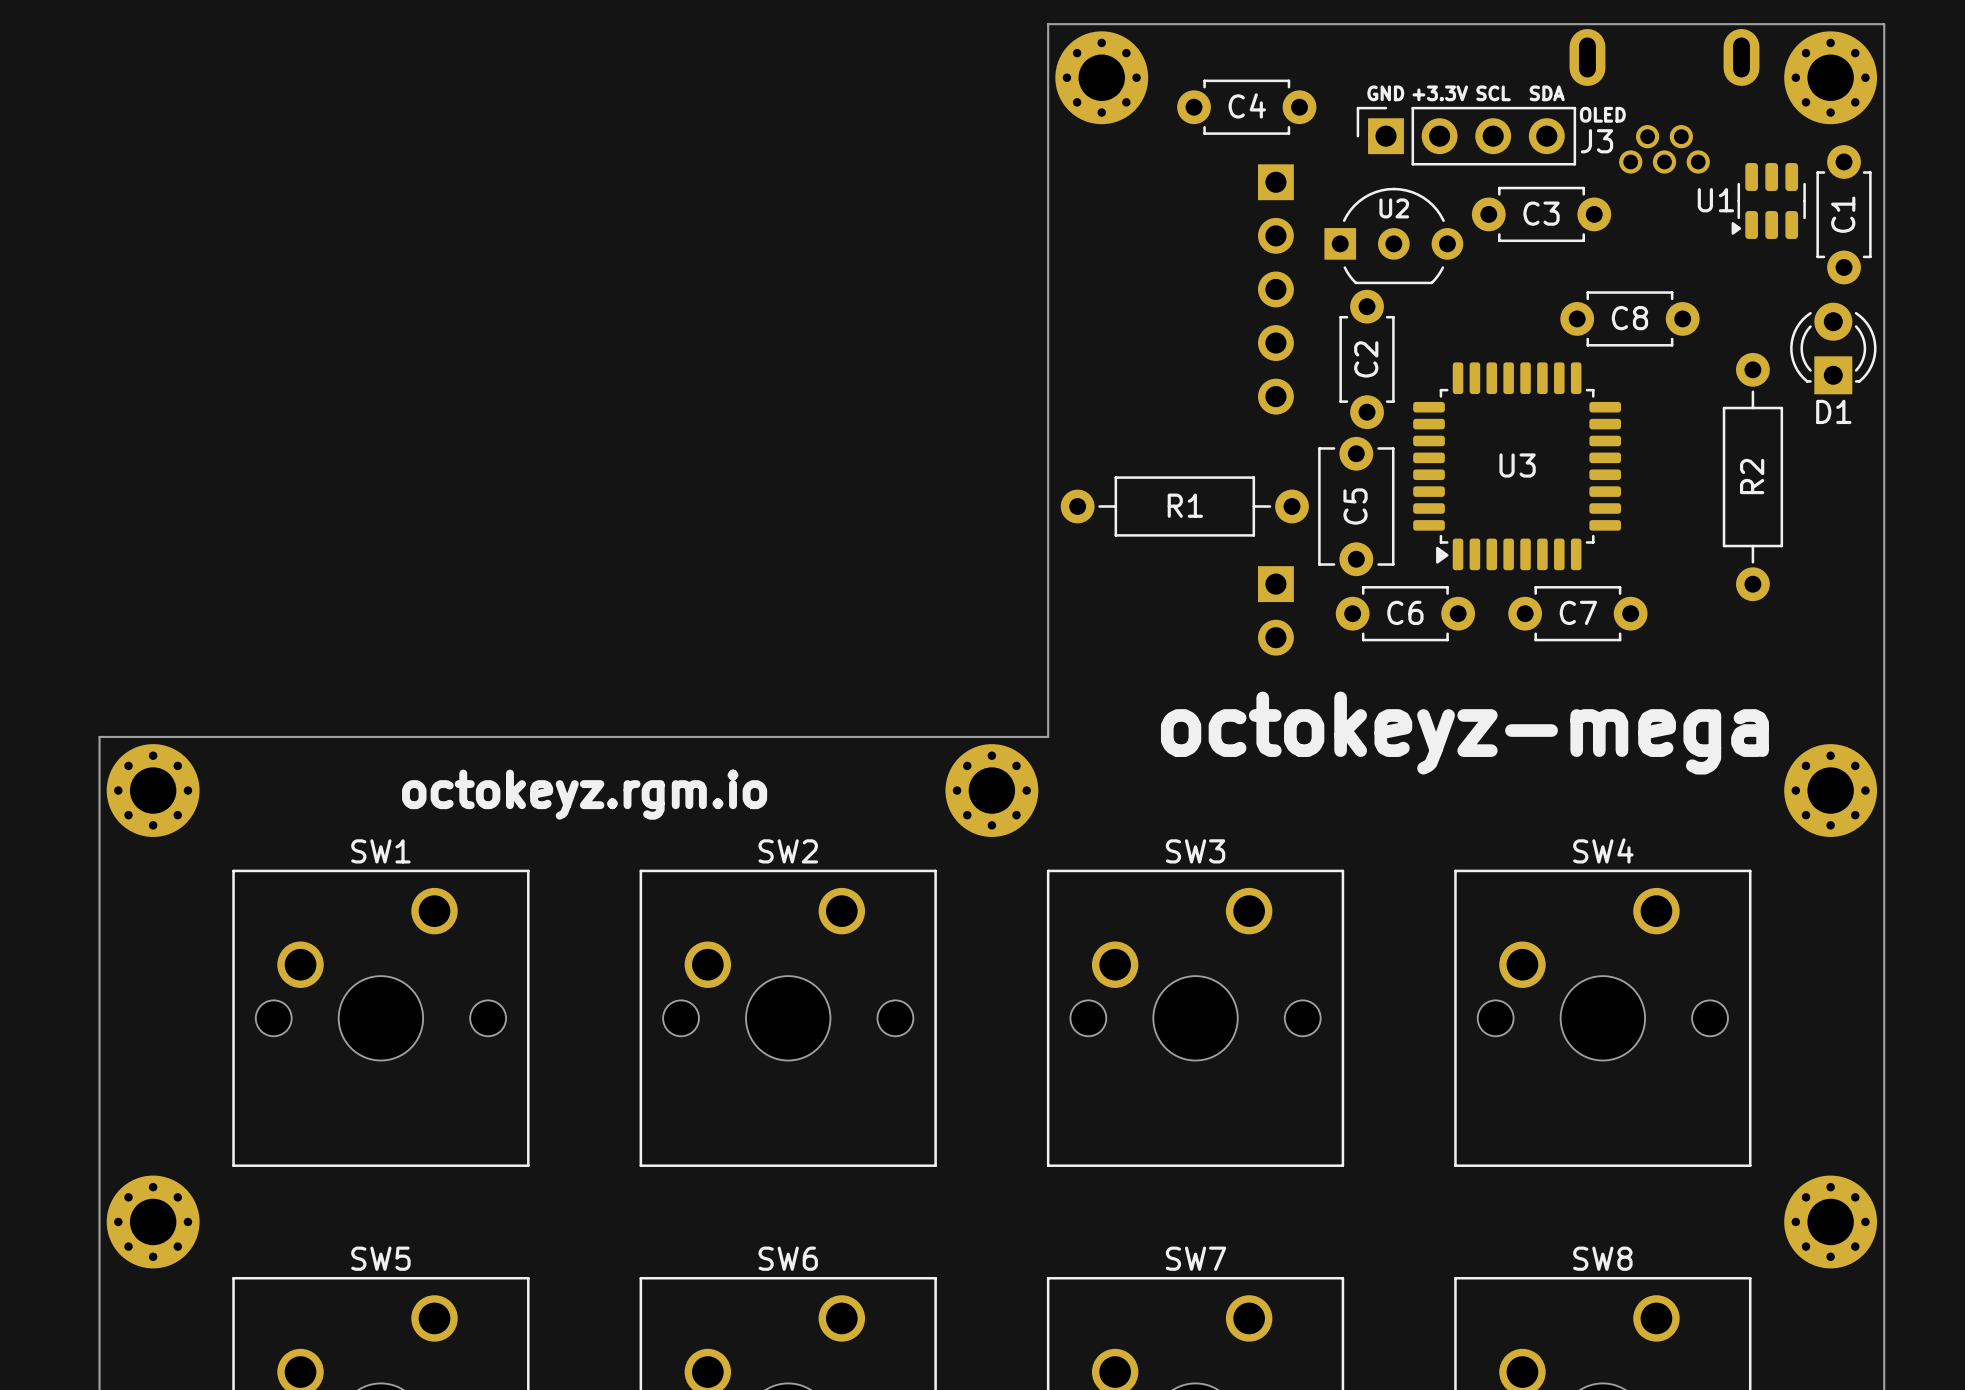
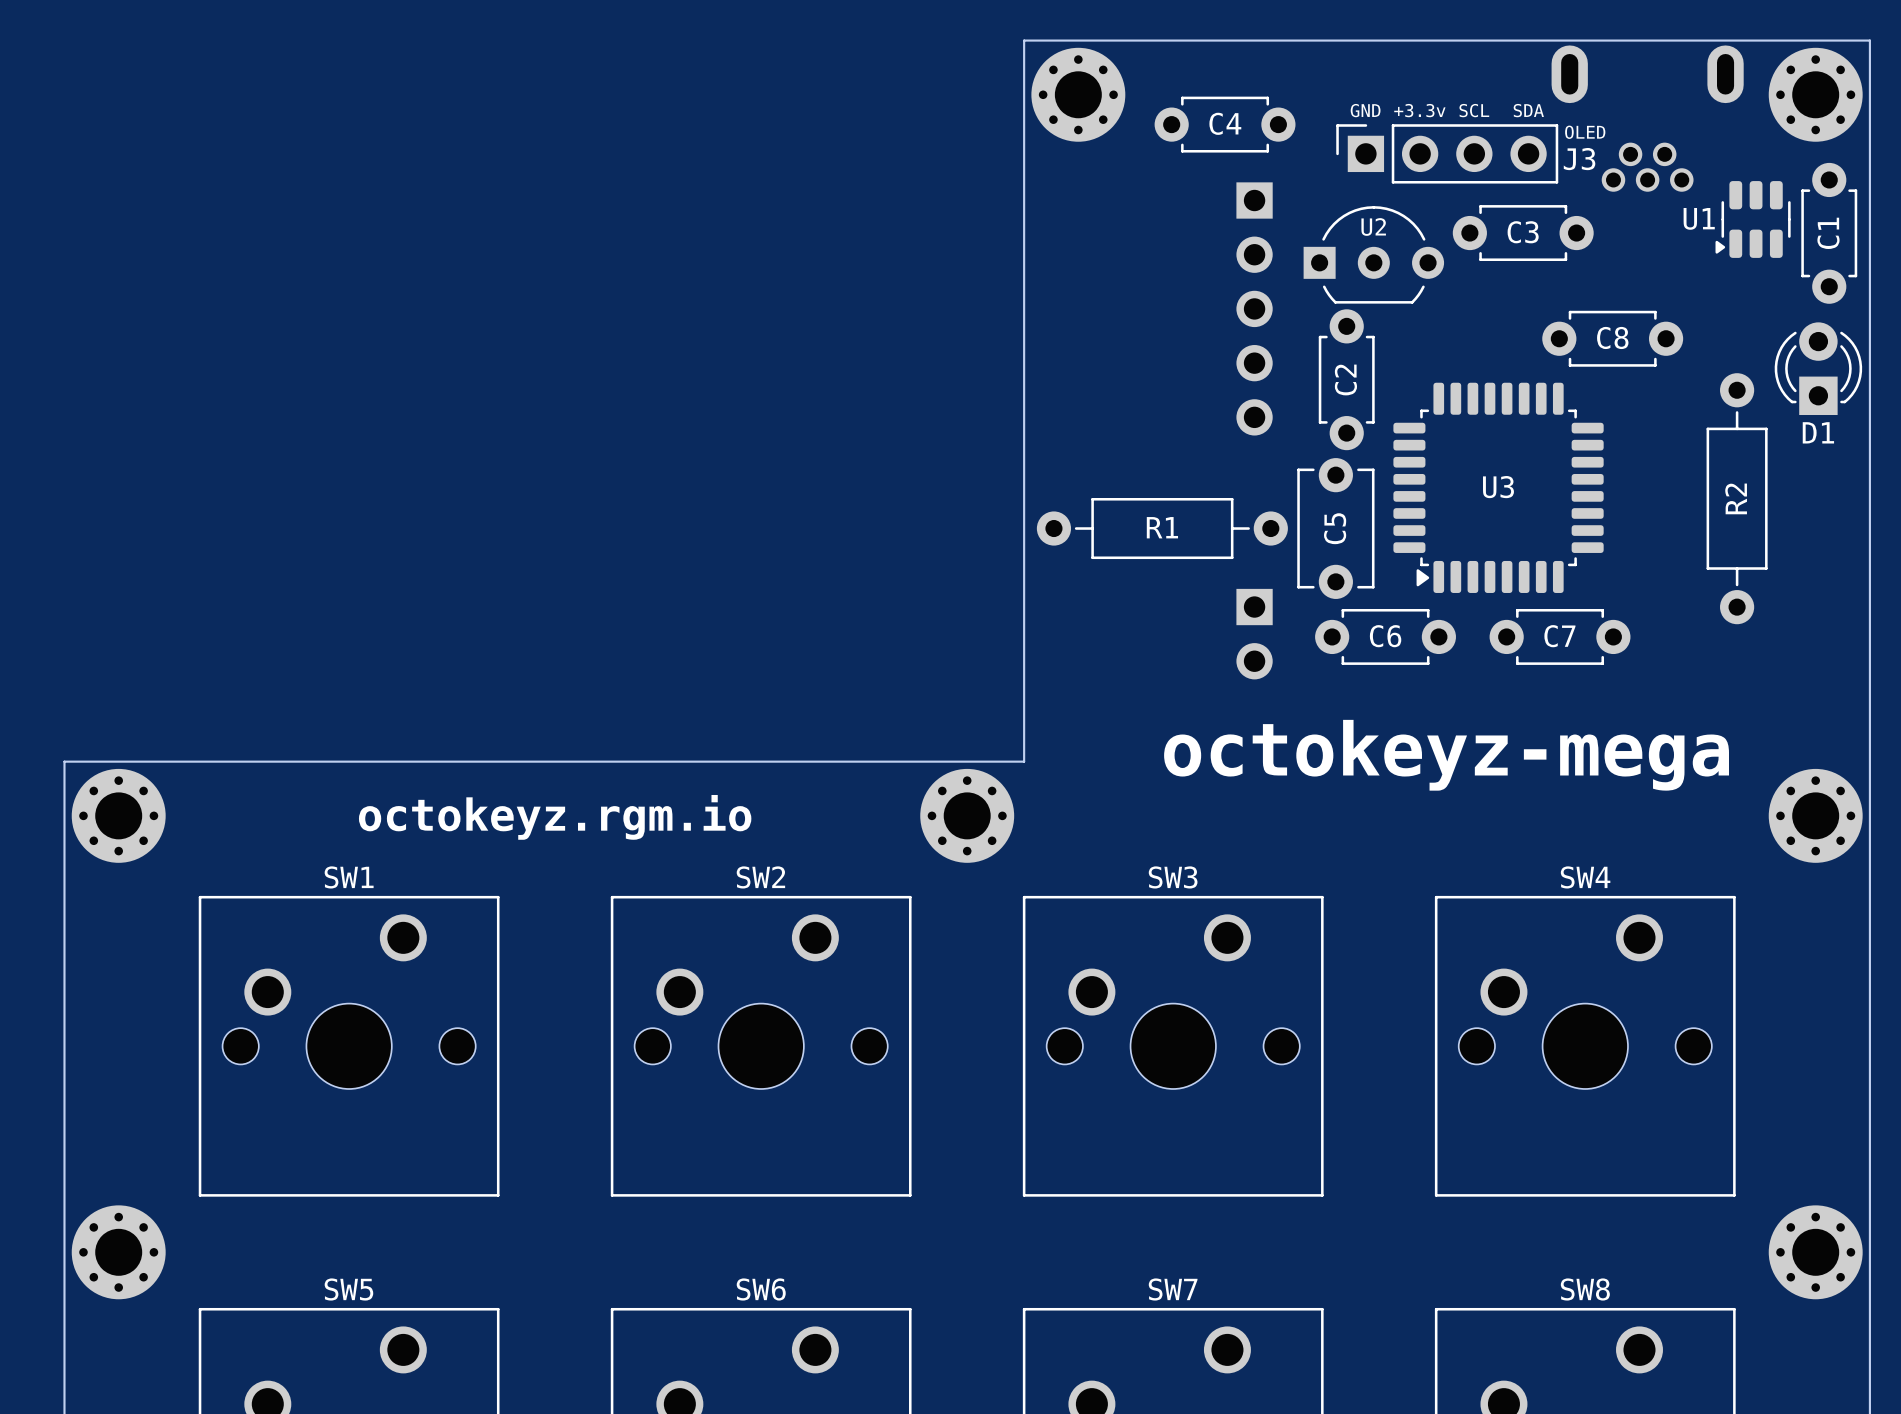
J3 text: none -> +3.3v (1419, 110)
text: +3.3V (1440, 93) -> none

